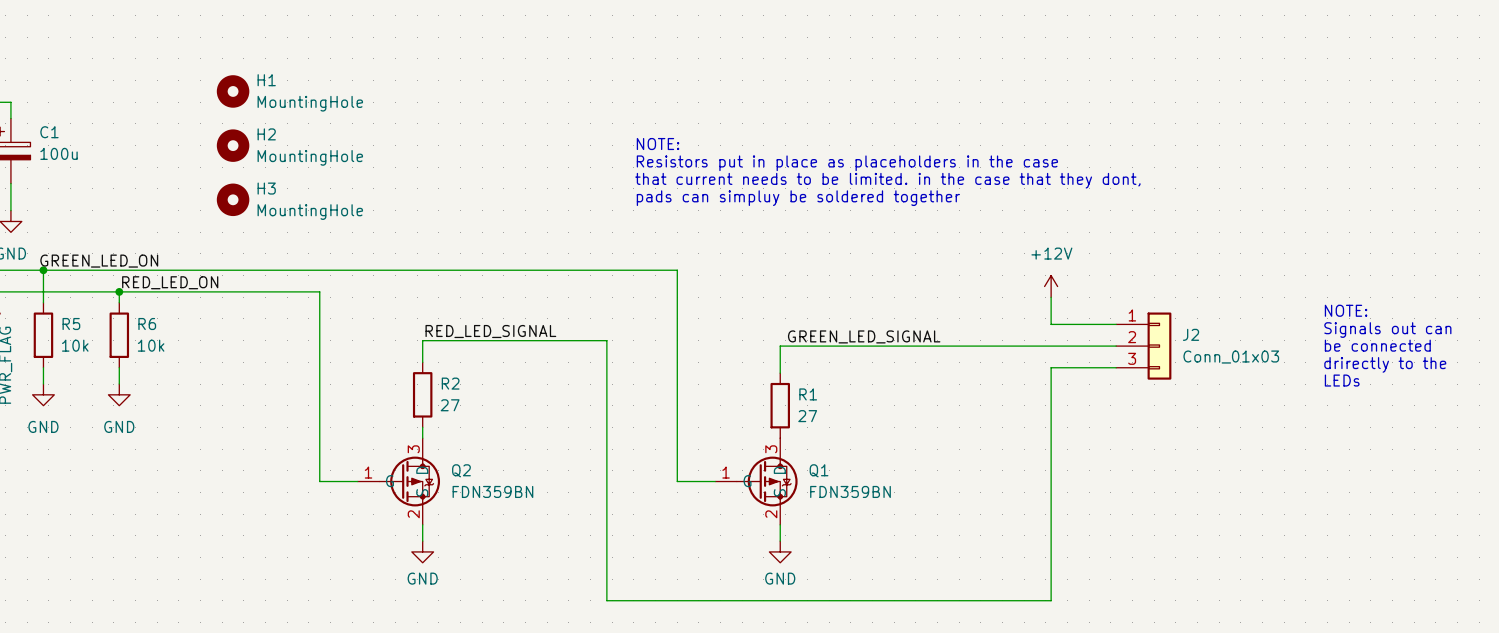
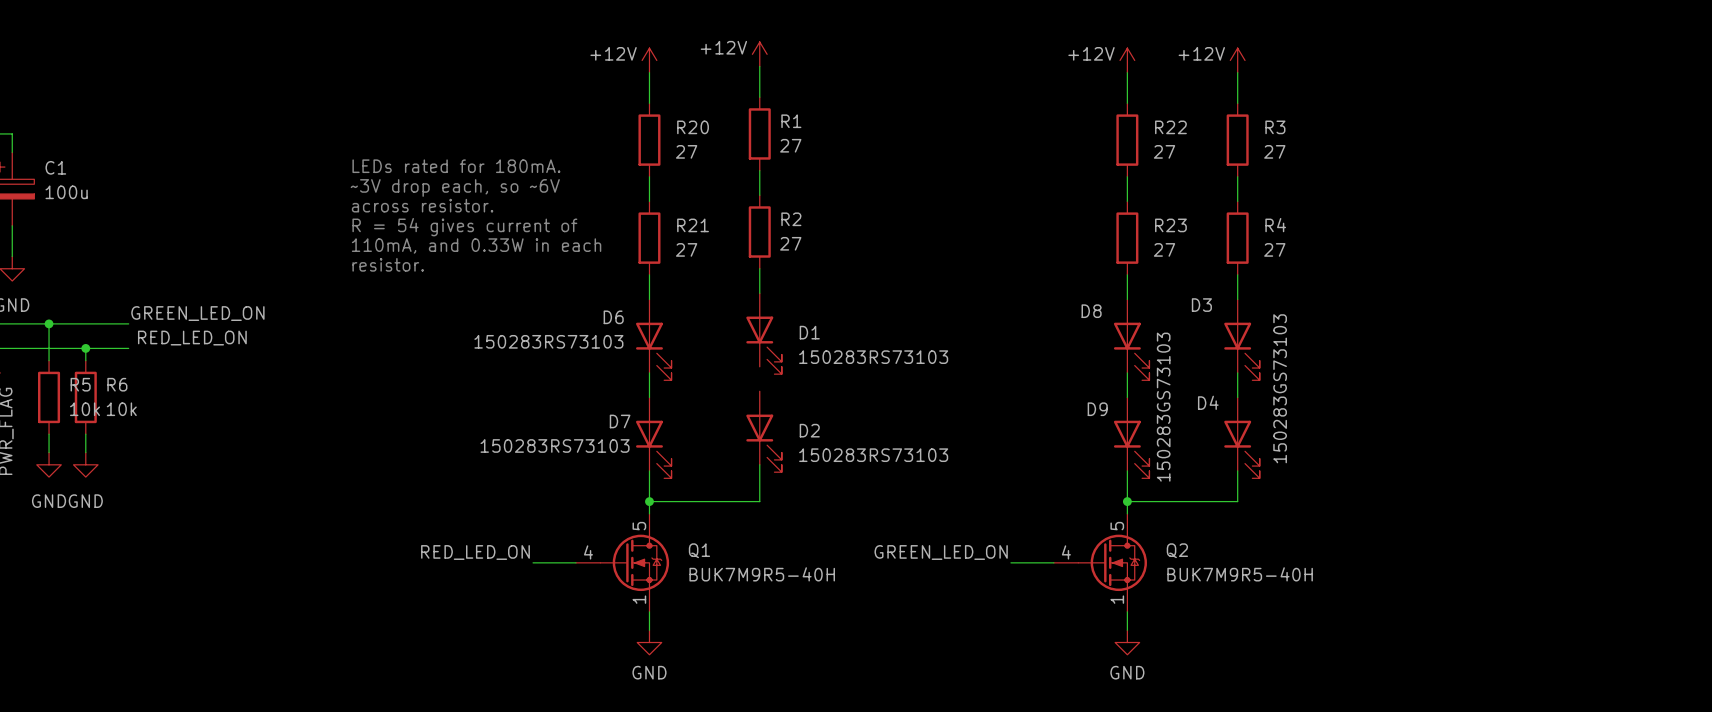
power symbol: none -> +12V (759, 54)
power symbol: none -> +12V (649, 60)
power symbol: none -> +12V (1127, 60)
power symbol: none -> +12V (1237, 60)
wire: none -> (759, 66) (759, 97)
wire: none -> (649, 72) (649, 103)
wire: none -> (1127, 72) (1127, 103)
wire: none -> (1237, 72) (1237, 103)
H1: MountingHole (233, 91) -> none
R20: none -> 27 (649, 140)
R22: none -> 27 (1127, 140)
R3: none -> 27 (1237, 140)
text: none -> LEDs rated for 180mA. (456, 166)
wire: none -> (759, 170) (759, 195)
wire: none -> (649, 176) (649, 201)
wire: none -> (1127, 176) (1127, 201)
wire: none -> (1237, 176) (1237, 201)
text: NOTE: (658, 144) -> none
H2: MountingHole (233, 145) -> none
text: none -> ~3V drop each, so ~6V (455, 187)
text: Resistors put in place as placeholders in the case (847, 163) -> none
text: none -> across resistor. (422, 205)
text: that current needs to be limited. in the case that they dont, (887, 180) -> none
text: none -> R = 54 gives current of (464, 227)
R21: none -> 27 (649, 238)
R23: none -> 27 (1127, 238)
R4: none -> 27 (1237, 238)
text: pads can simpluy be soldered together (798, 198) -> none
H3: MountingHole (233, 199) -> none
text: none -> 110mA, and 0.33W in each (476, 245)
text: none -> resistor. (388, 264)
wire: none -> (759, 268) (759, 293)
wire: none -> (649, 274) (649, 299)
wire: none -> (1127, 274) (1127, 299)
wire: none -> (1237, 274) (1237, 299)
label position: GREEN_LED_ON (99, 261) -> GREEN_LED_ON (197, 313)
wire: (113, 270) (677, 270) (677, 481) (715, 481) -> none
D1: none -> 150283RS73103 (764, 333)
D6: none -> 150283RS73103 (653, 339)
D8: none -> (1131, 339)
D3: none -> 150283GS73103 (1241, 339)
power symbol: +12V (1051, 286) -> none
wire: (113, 291) (319, 291) (319, 481) (357, 481) -> none
wire: (119, 291) (119, 302) -> (85, 348) (85, 360)
junction position: (119, 291) -> (85, 348)
wire: (1051, 297) (1051, 324) (1116, 324) -> none
text: NOTE: (1346, 310) -> none
wire: none -> (649, 372) (649, 397)
wire: none -> (1127, 372) (1127, 397)
wire: none -> (1237, 372) (1237, 397)
text: Signals out can (1387, 330) -> none
label: RED_LED_SIGNAL (490, 331) -> none
R6 position: (119, 335) -> (85, 397)
label: GREEN_LED_SIGNAL (864, 336) -> none
text: be connected (1377, 345) -> none
wire: (1116, 346) (780, 346) (780, 373) -> none
J2: Conn_01x03 (1143, 346) -> none
wire: (422, 362) (422, 340) (606, 340) (606, 600) (1051, 600) (1051, 367) (1116, 367) -> none
text: drirectly to the (1385, 364) -> none
D2: none -> 150283RS73103 (764, 431)
wire: (119, 367) (119, 384) -> (85, 434) (85, 452)
D7: none -> 150283RS73103 (653, 437)
D9: none -> 150283GS73103 (1131, 437)
D4: none -> (1241, 437)
text: LEDs (1342, 380) -> none
power symbol position: GND (119, 394) -> GND (85, 464)
R2 position: (422, 394) -> (759, 232)
wire: none -> (759, 464) (759, 501) (649, 501)
wire: none -> (649, 470) (649, 501)
wire: none -> (1127, 470) (1127, 513)
wire: none -> (1237, 470) (1237, 501) (1127, 501)
R1 position: (780, 405) -> (759, 133)
wire: (422, 427) (422, 438) -> (649, 501) (649, 513)
junction: none -> (649, 501)
junction: none -> (1127, 501)
Q2 symbol: [357, 438, 441, 525] -> [1053, 513, 1147, 612]
Q1 symbol: [715, 438, 798, 525] -> [575, 513, 670, 612]
label: none -> RED_LED_ON (475, 552)
label: none -> GREEN_LED_ON (941, 552)
wire: none -> (533, 562) (575, 562)
wire: none -> (1010, 562) (1053, 562)
Q2 value: FDN359BN (492, 491) -> BUK7M9R5-40H (1240, 574)
Q1 value: FDN359BN (850, 491) -> BUK7M9R5-40H (762, 574)
wire: (422, 524) (422, 541) -> (649, 611) (649, 630)
wire: (780, 524) (780, 541) -> none
wire: none -> (1127, 611) (1127, 630)
power symbol: GND (422, 551) -> none
power symbol: none -> GND (649, 642)
power symbol: GND (780, 551) -> none
power symbol: none -> GND (1127, 642)

